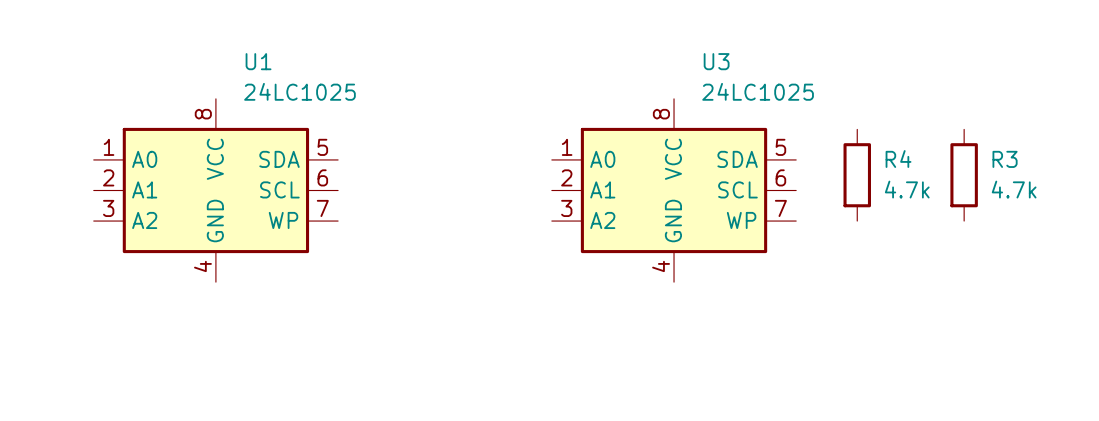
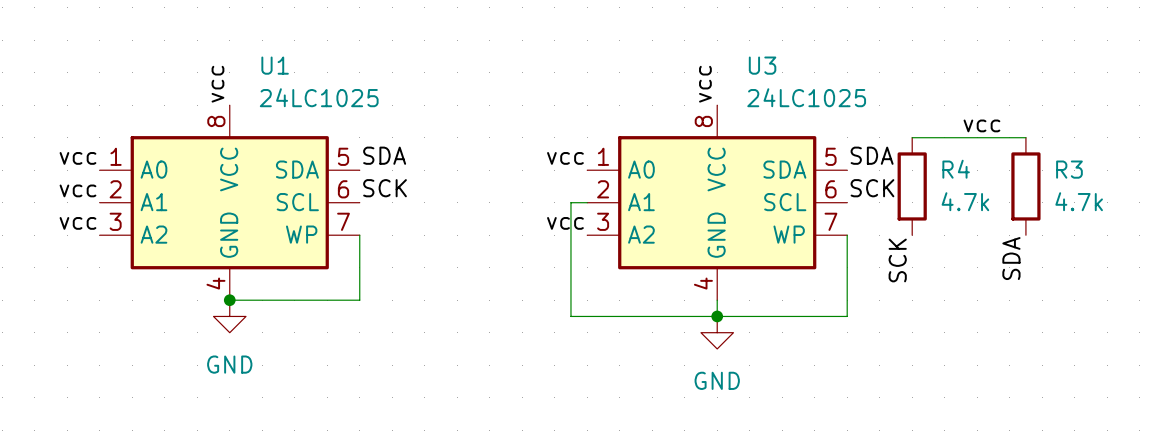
label: none -> vcc (217, 84)
label: none -> vcc (705, 84)
label: none -> vcc (981, 125)
wire: none -> (912, 137) (1025, 137)
label: none -> SDA (384, 155)
label: none -> SDA (872, 155)
label: none -> vcc (77, 158)
label: none -> vcc (565, 158)
label: none -> SCK (385, 188)
label: none -> SCK (872, 188)
label: none -> vcc (77, 190)
wire: none -> (587, 202) (570, 202) (570, 316) (847, 316) (847, 235)
label: none -> vcc (77, 223)
label: none -> vcc (565, 223)
wire: none -> (359, 235) (359, 300) (229, 300)
label: none -> SDA (1011, 258)
label: none -> SCK (897, 260)
junction: none -> (229, 300)
wire: none -> (717, 300) (717, 316)
power symbol: none -> GND (229, 316)
junction: none -> (717, 316)
power symbol: none -> GND (717, 332)

